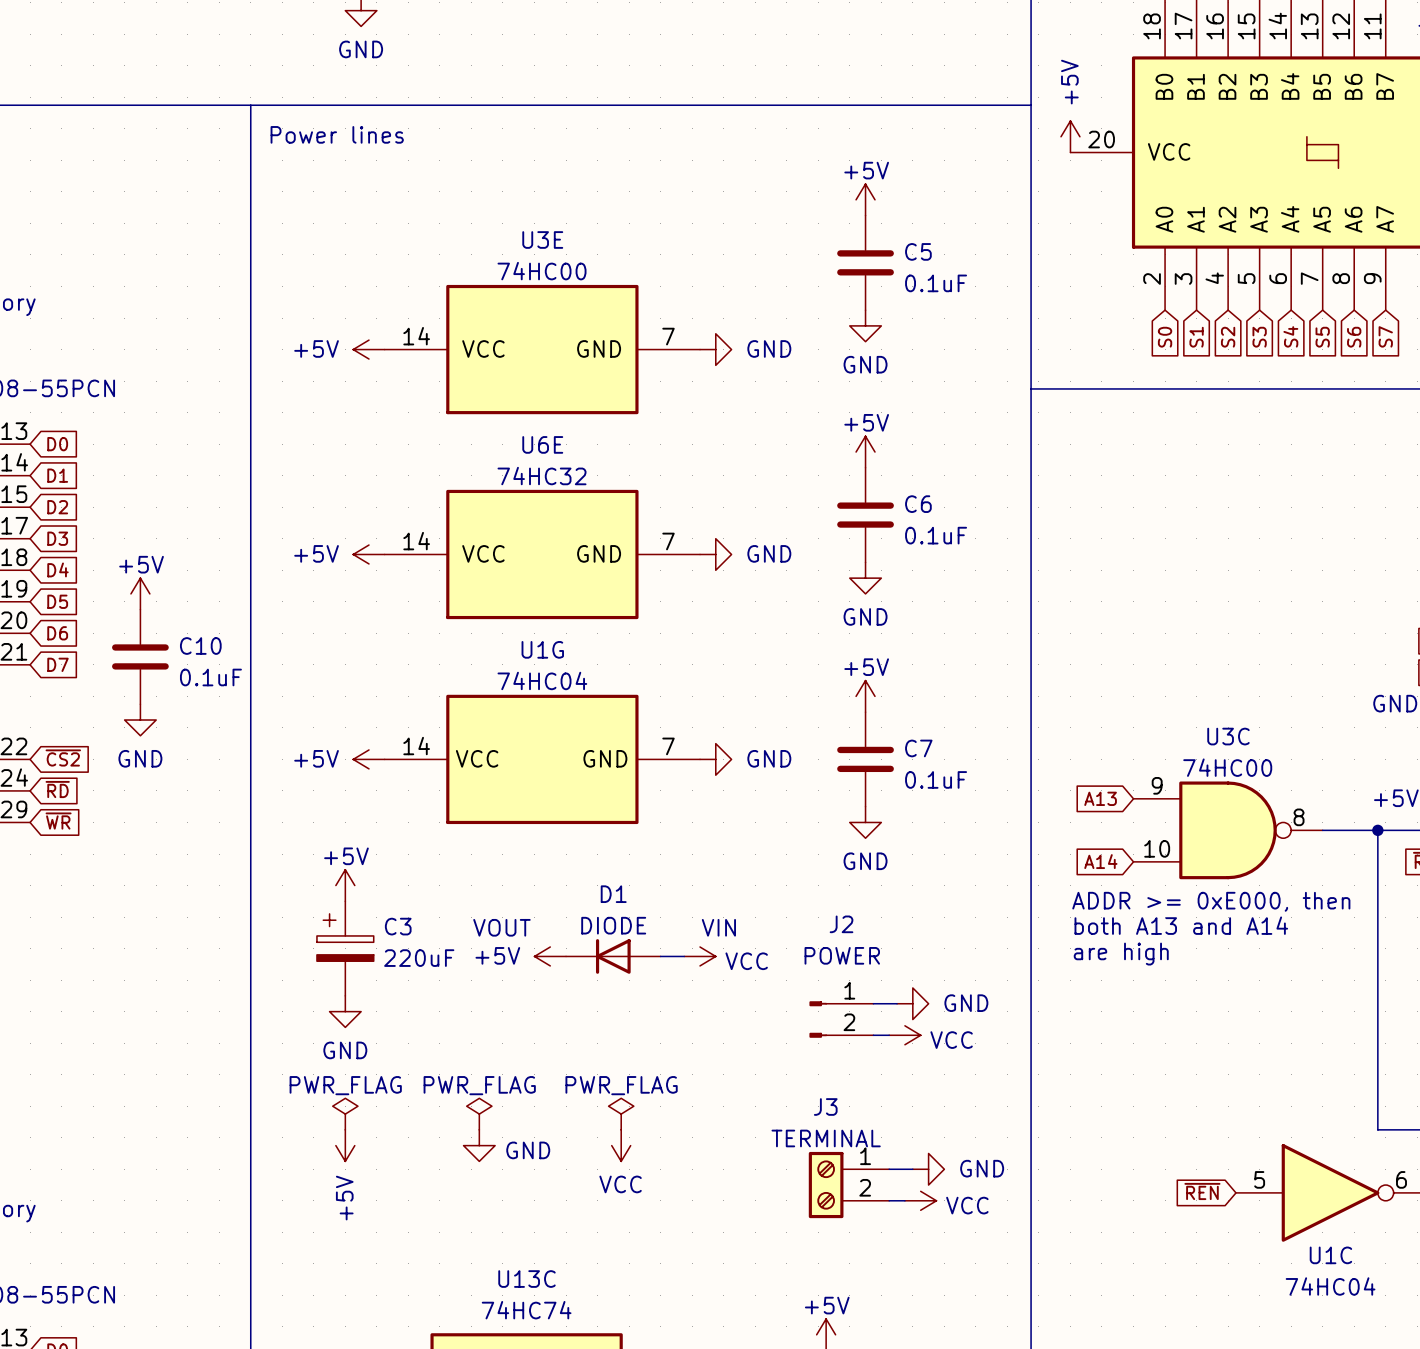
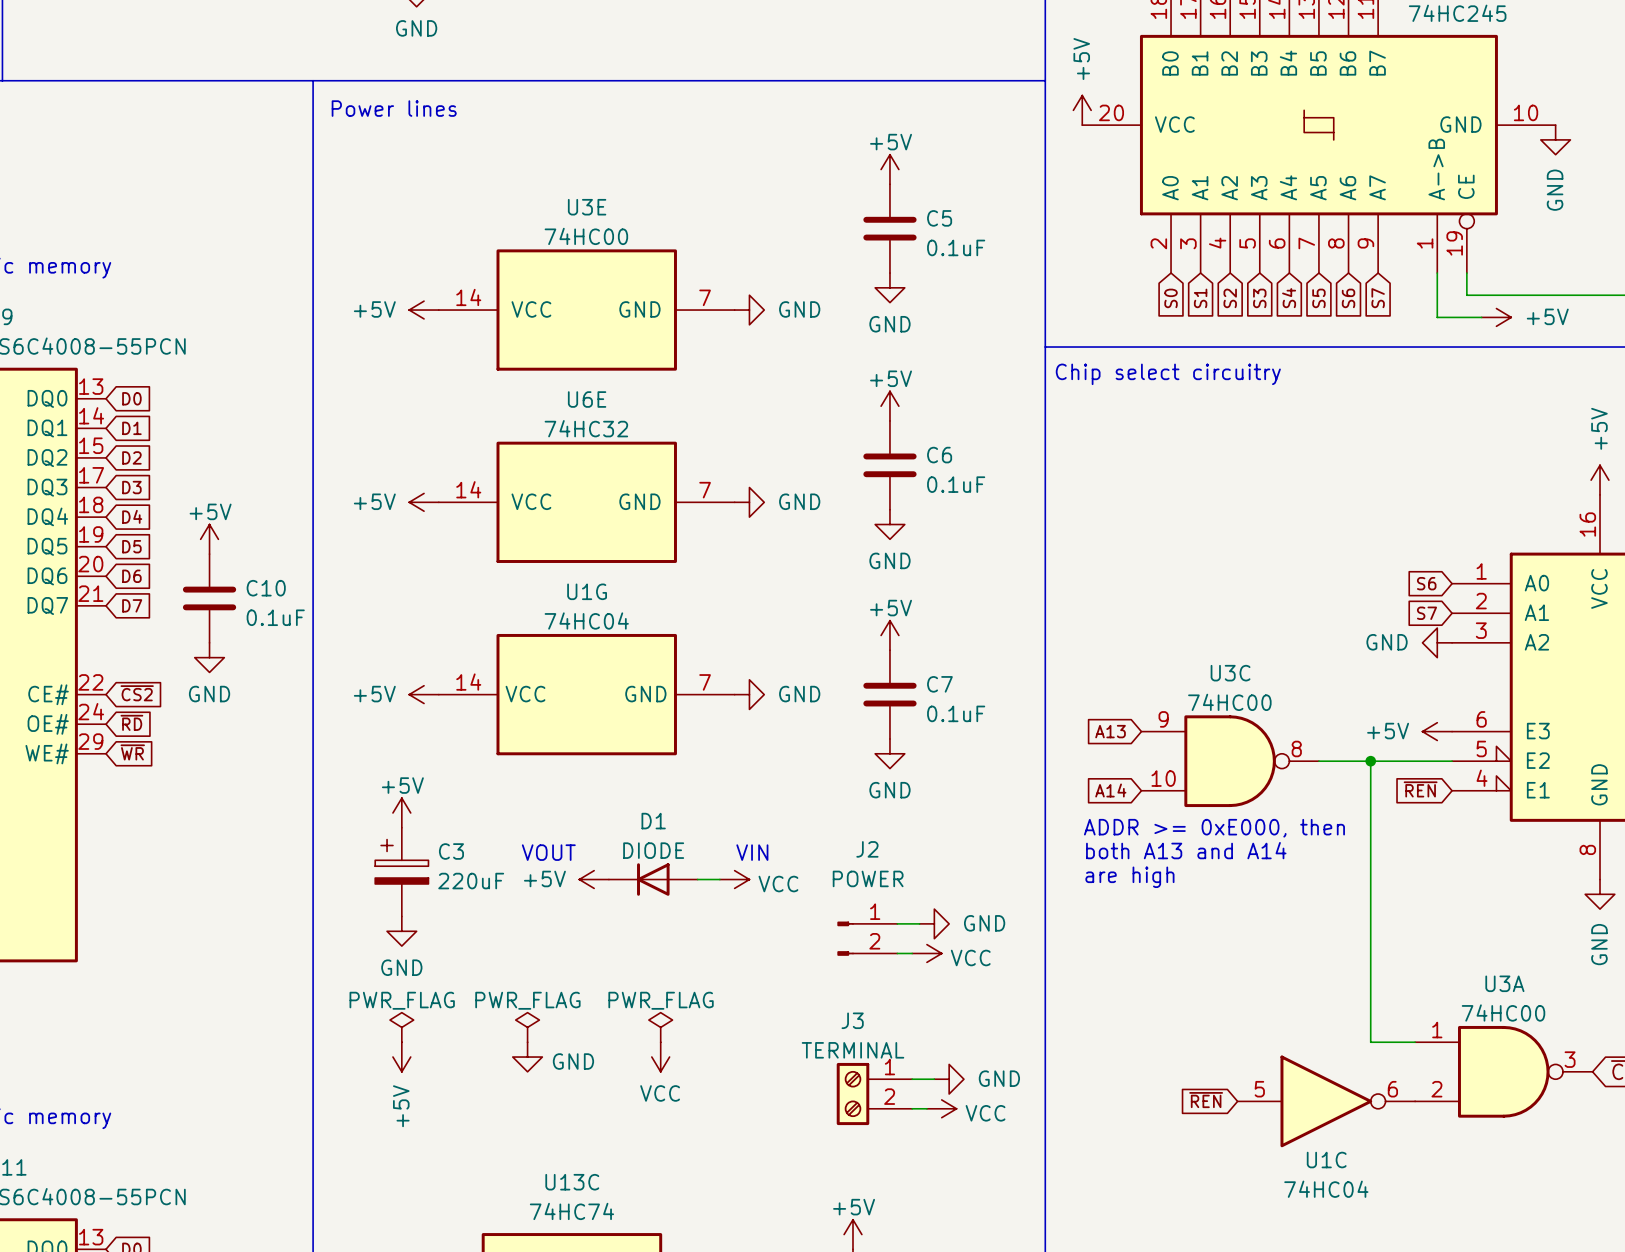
text: none -> Chip select circuitry (1168, 374)

